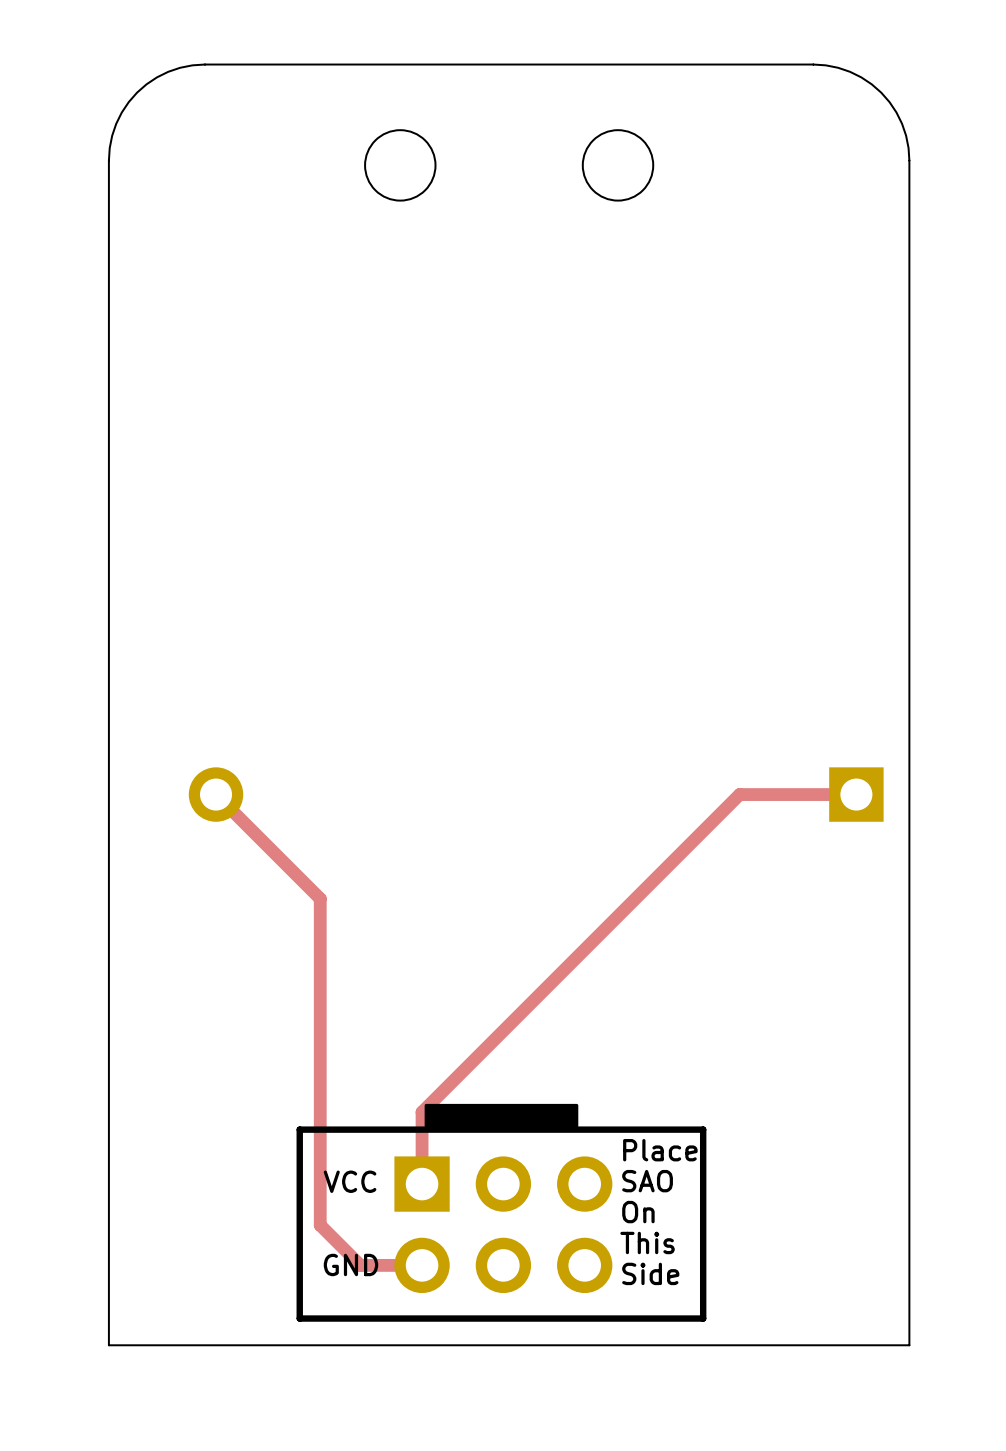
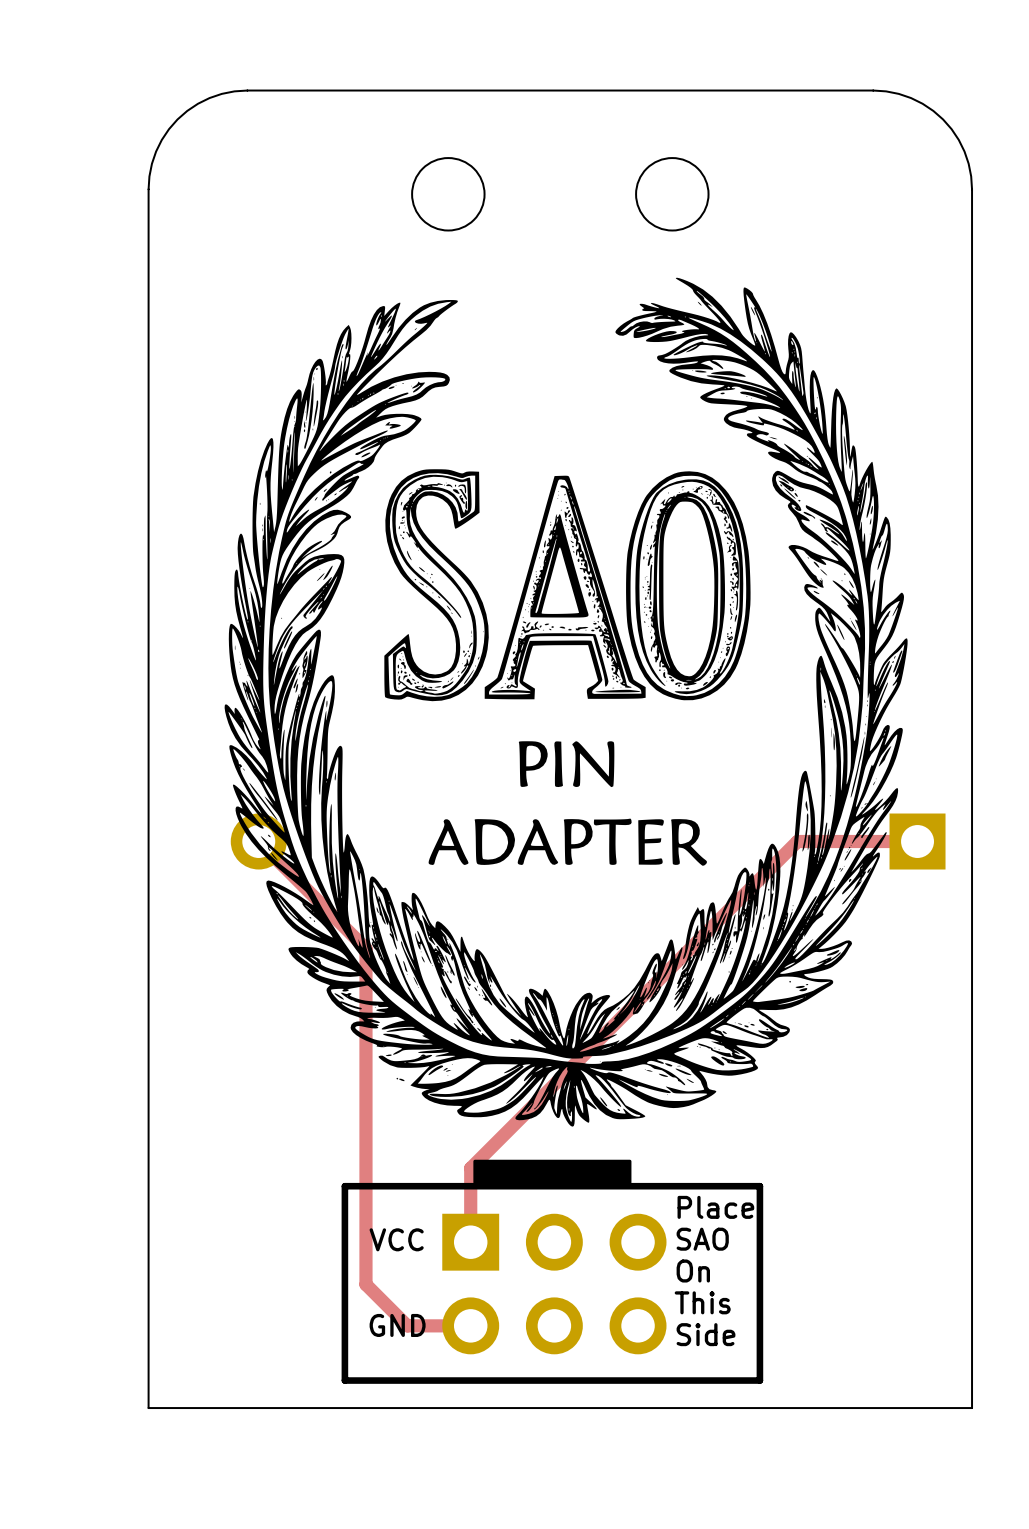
drawing: none -> [224, 277, 908, 1127]

